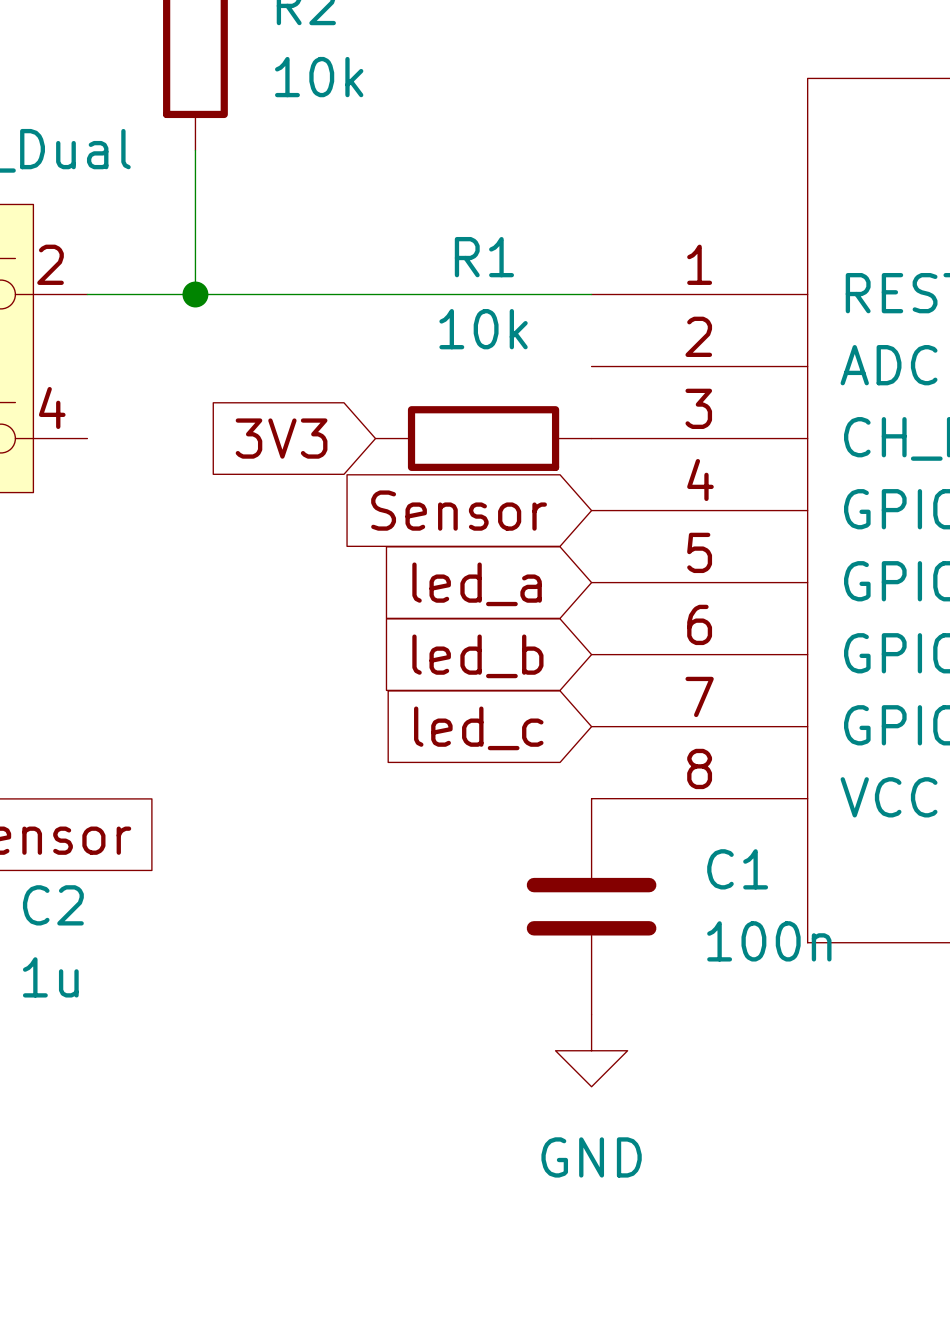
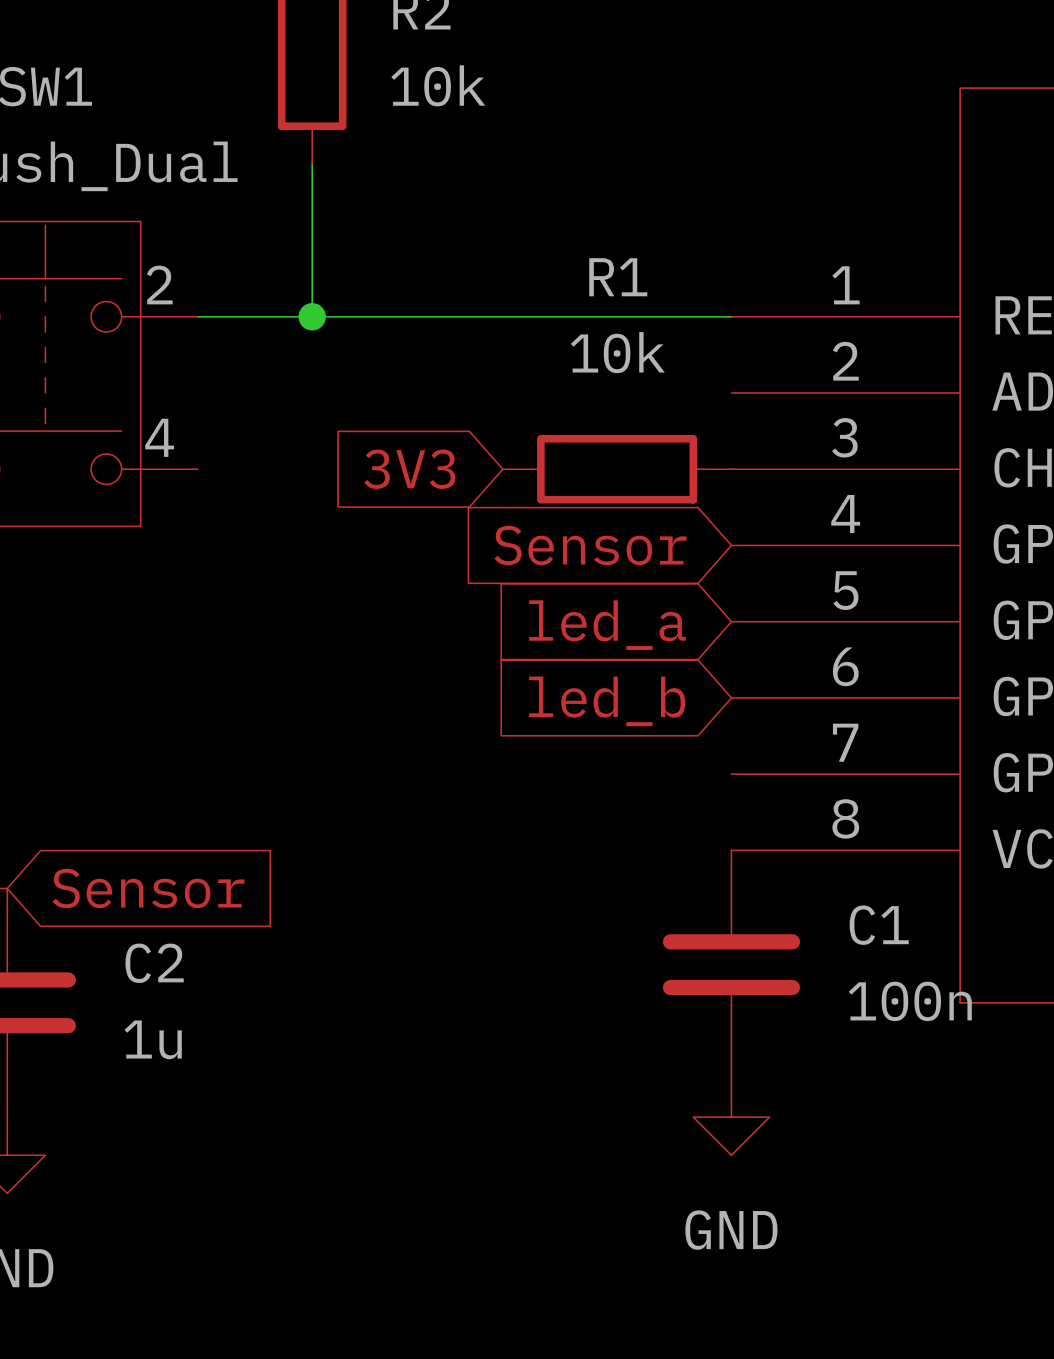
global label: led_c (478, 728) -> none

